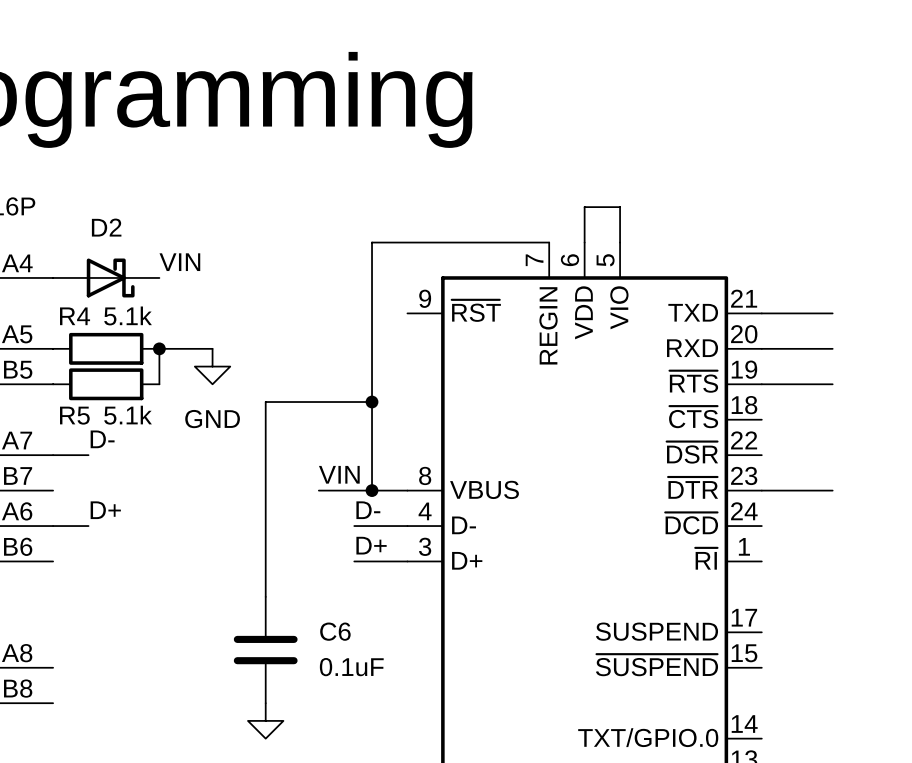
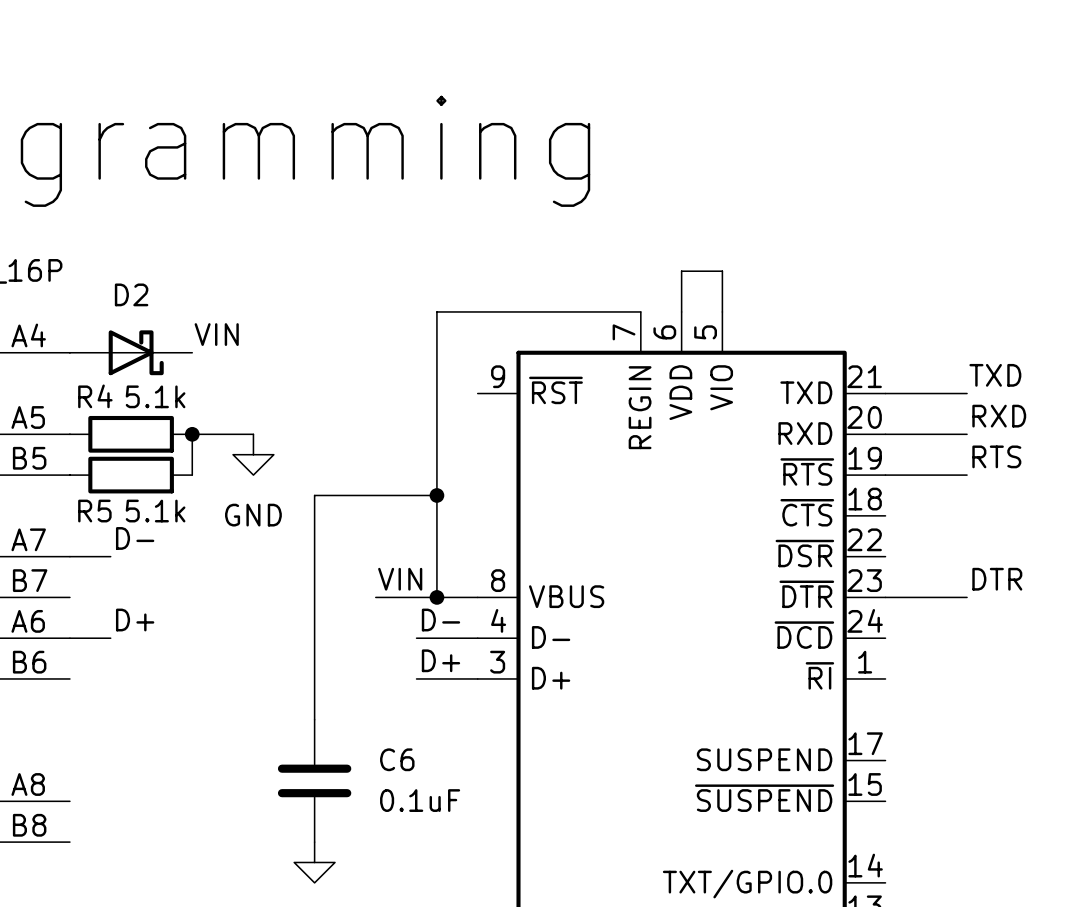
label: none -> TXD (995, 375)
label: none -> RXD (999, 416)
label: none -> RTS (996, 456)
label: none -> DTR (997, 579)

